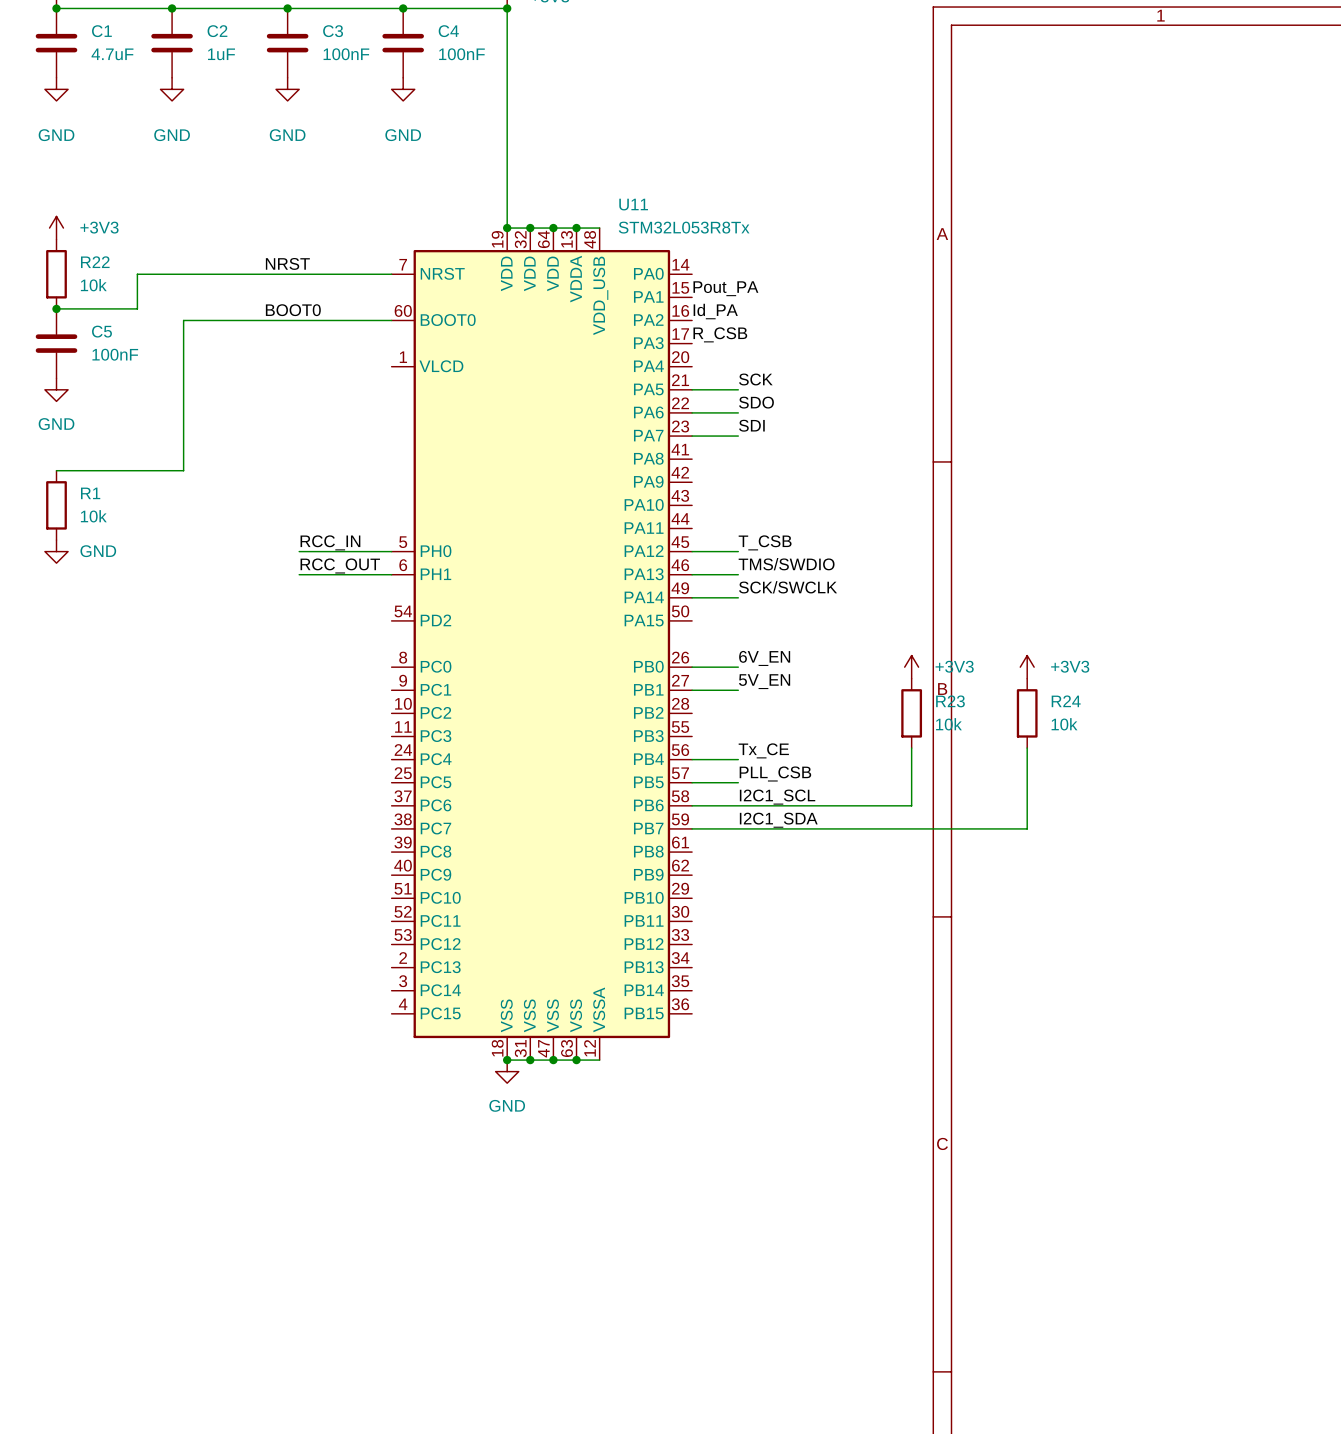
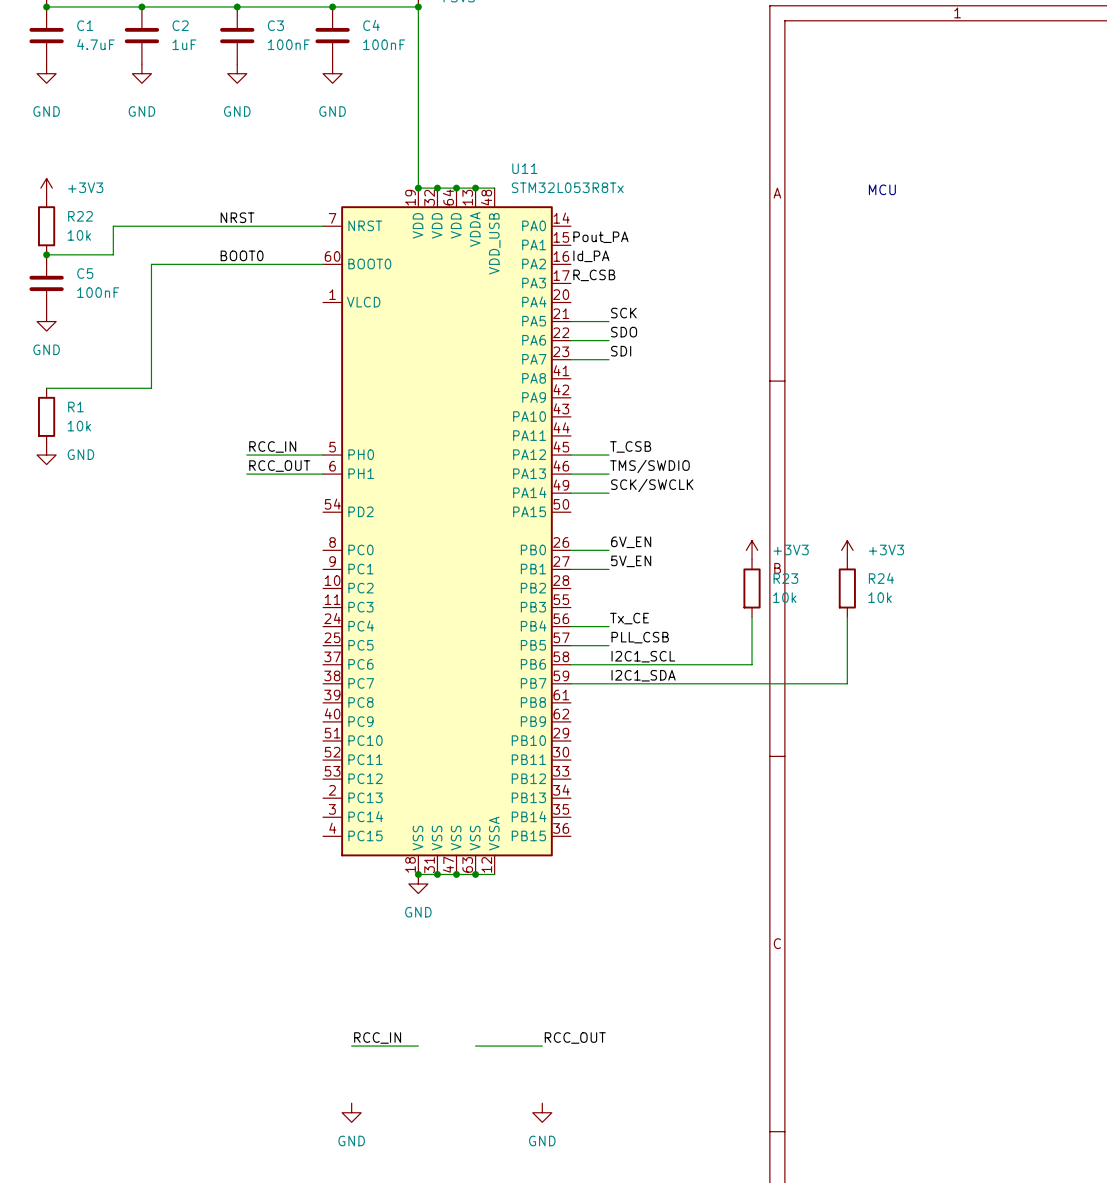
text: none -> MCU (882, 189)
label: none -> RCC_IN (377, 1037)
label: none -> RCC_OUT (575, 1037)
wire: none -> (351, 1046) (418, 1046)
wire: none -> (475, 1046) (542, 1046)
power symbol: none -> GND (351, 1112)
power symbol: none -> GND (542, 1112)

